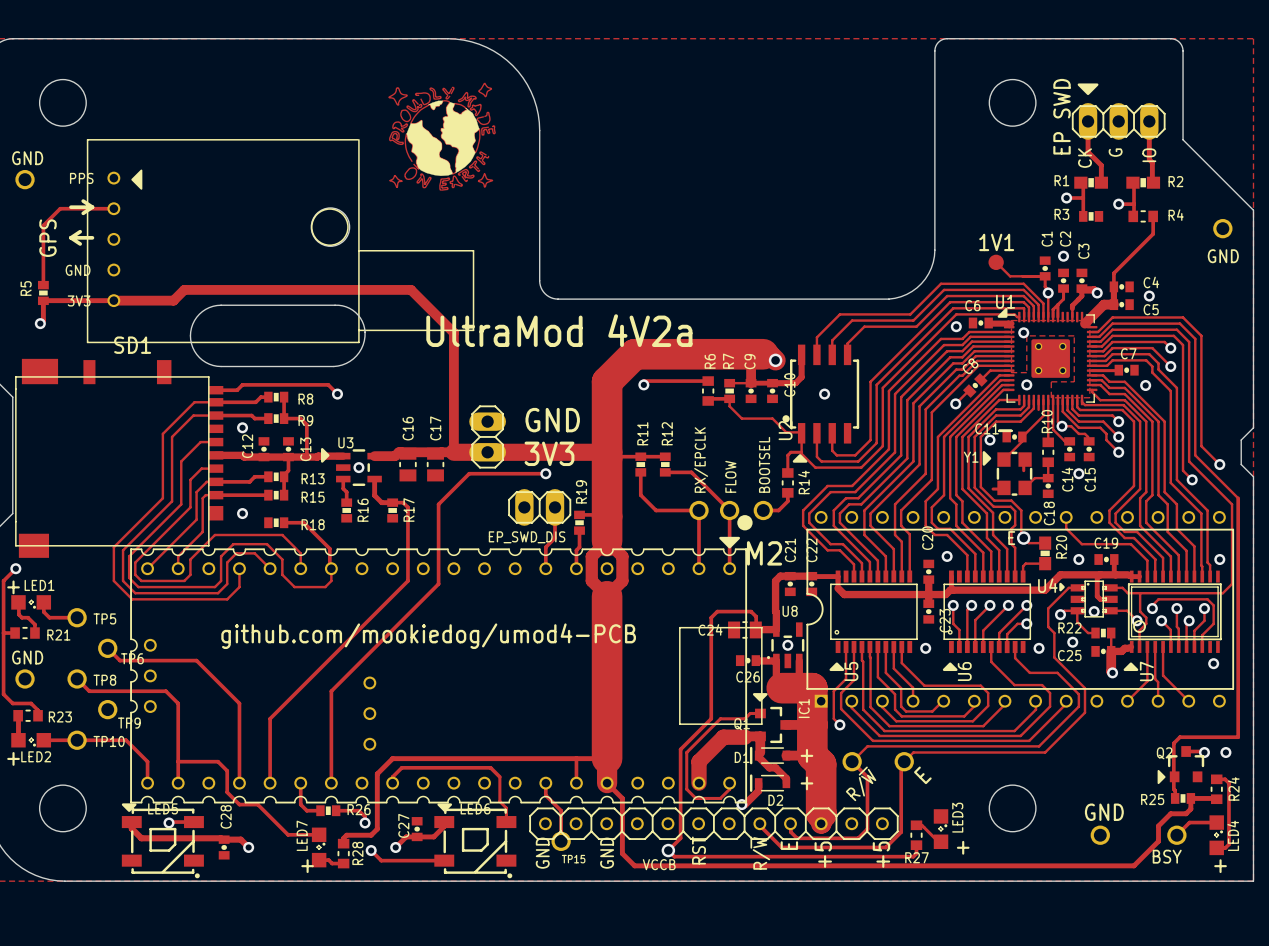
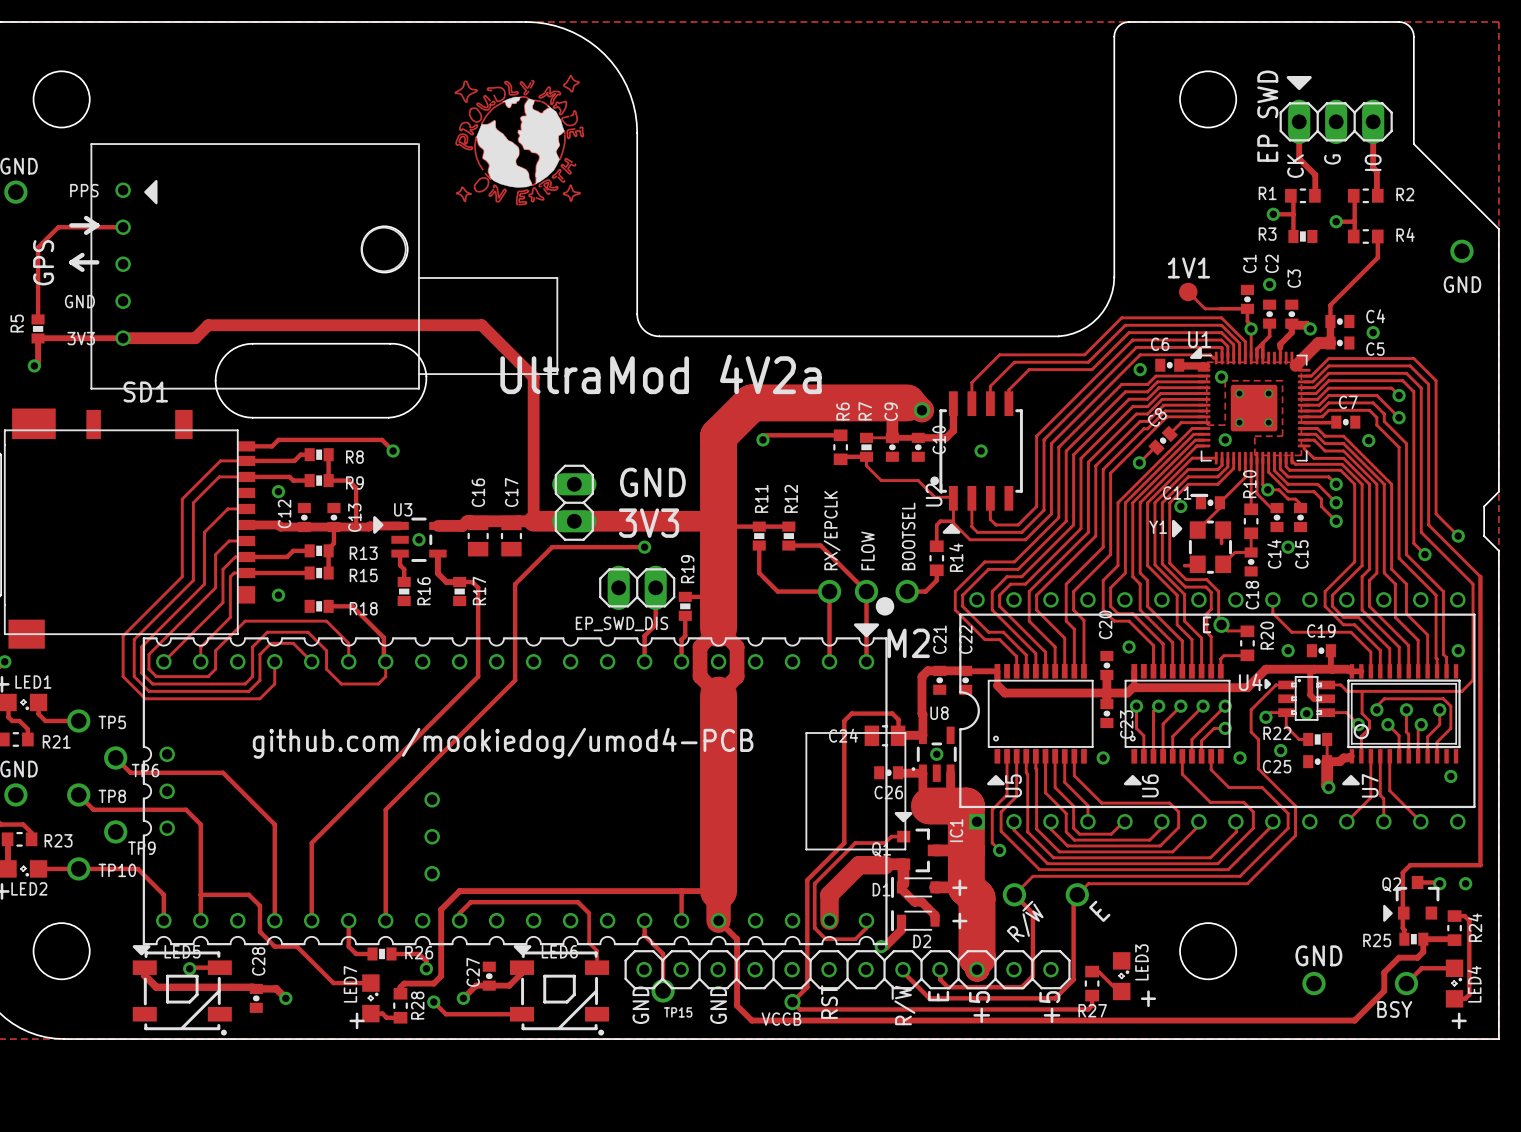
R1 footprint: [1074, 176, 1109, 189] -> [1285, 188, 1321, 204]
R2 footprint: [1126, 176, 1161, 189] -> [1347, 188, 1384, 204]
R20 footprint: [1039, 536, 1052, 571] -> [1240, 625, 1255, 662]

